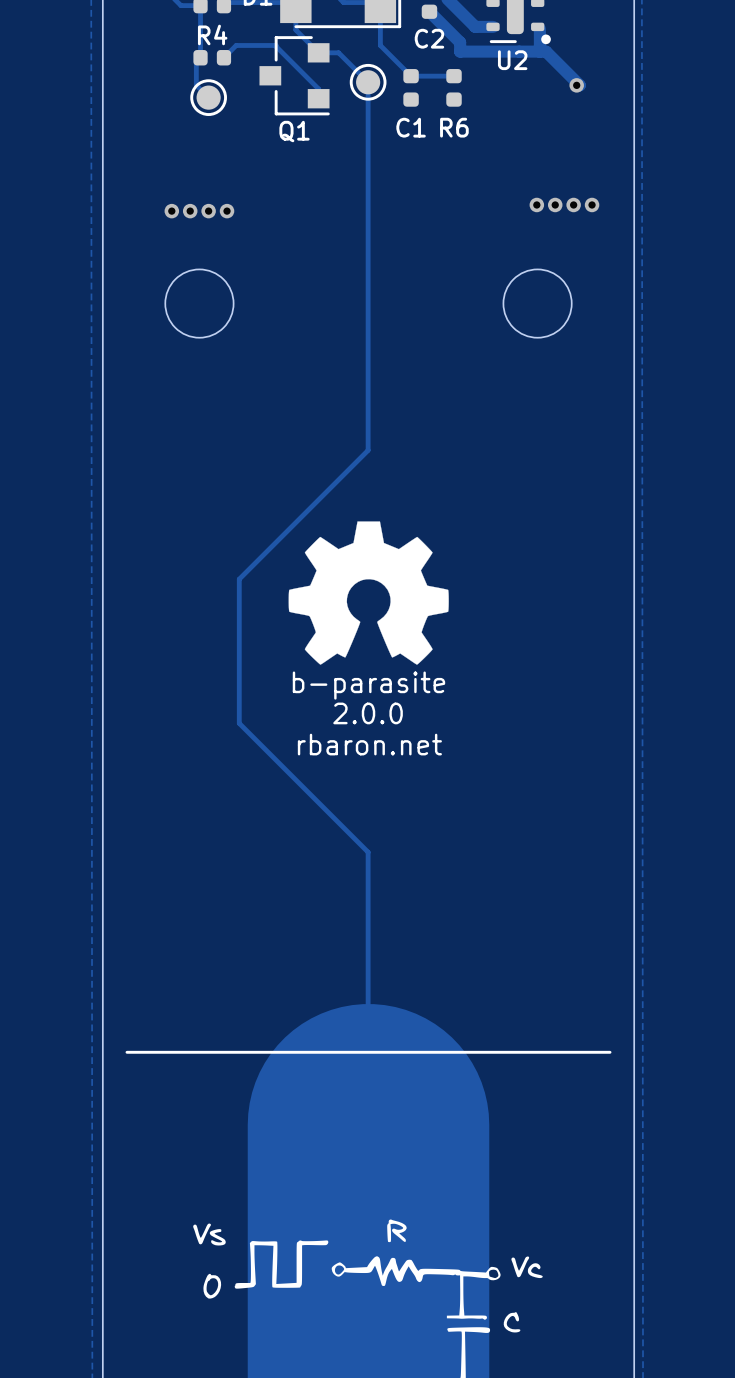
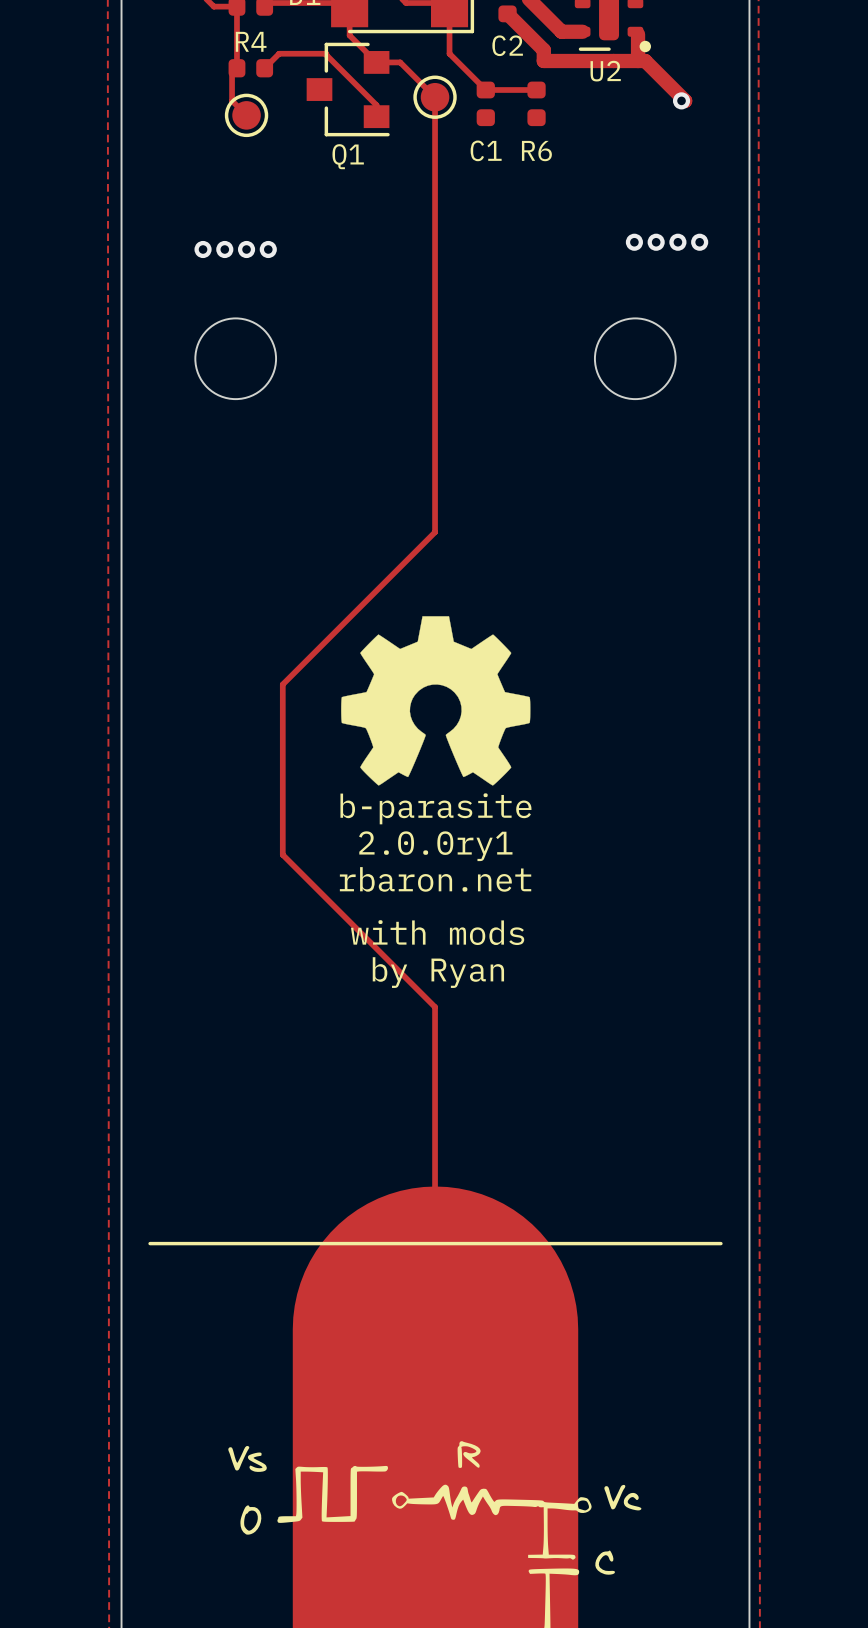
text: 2.0.0 (368, 713) -> 2.0.0ry1 (435, 846)
text: none -> with mods (437, 932)
text: none -> by Ryan (438, 972)

